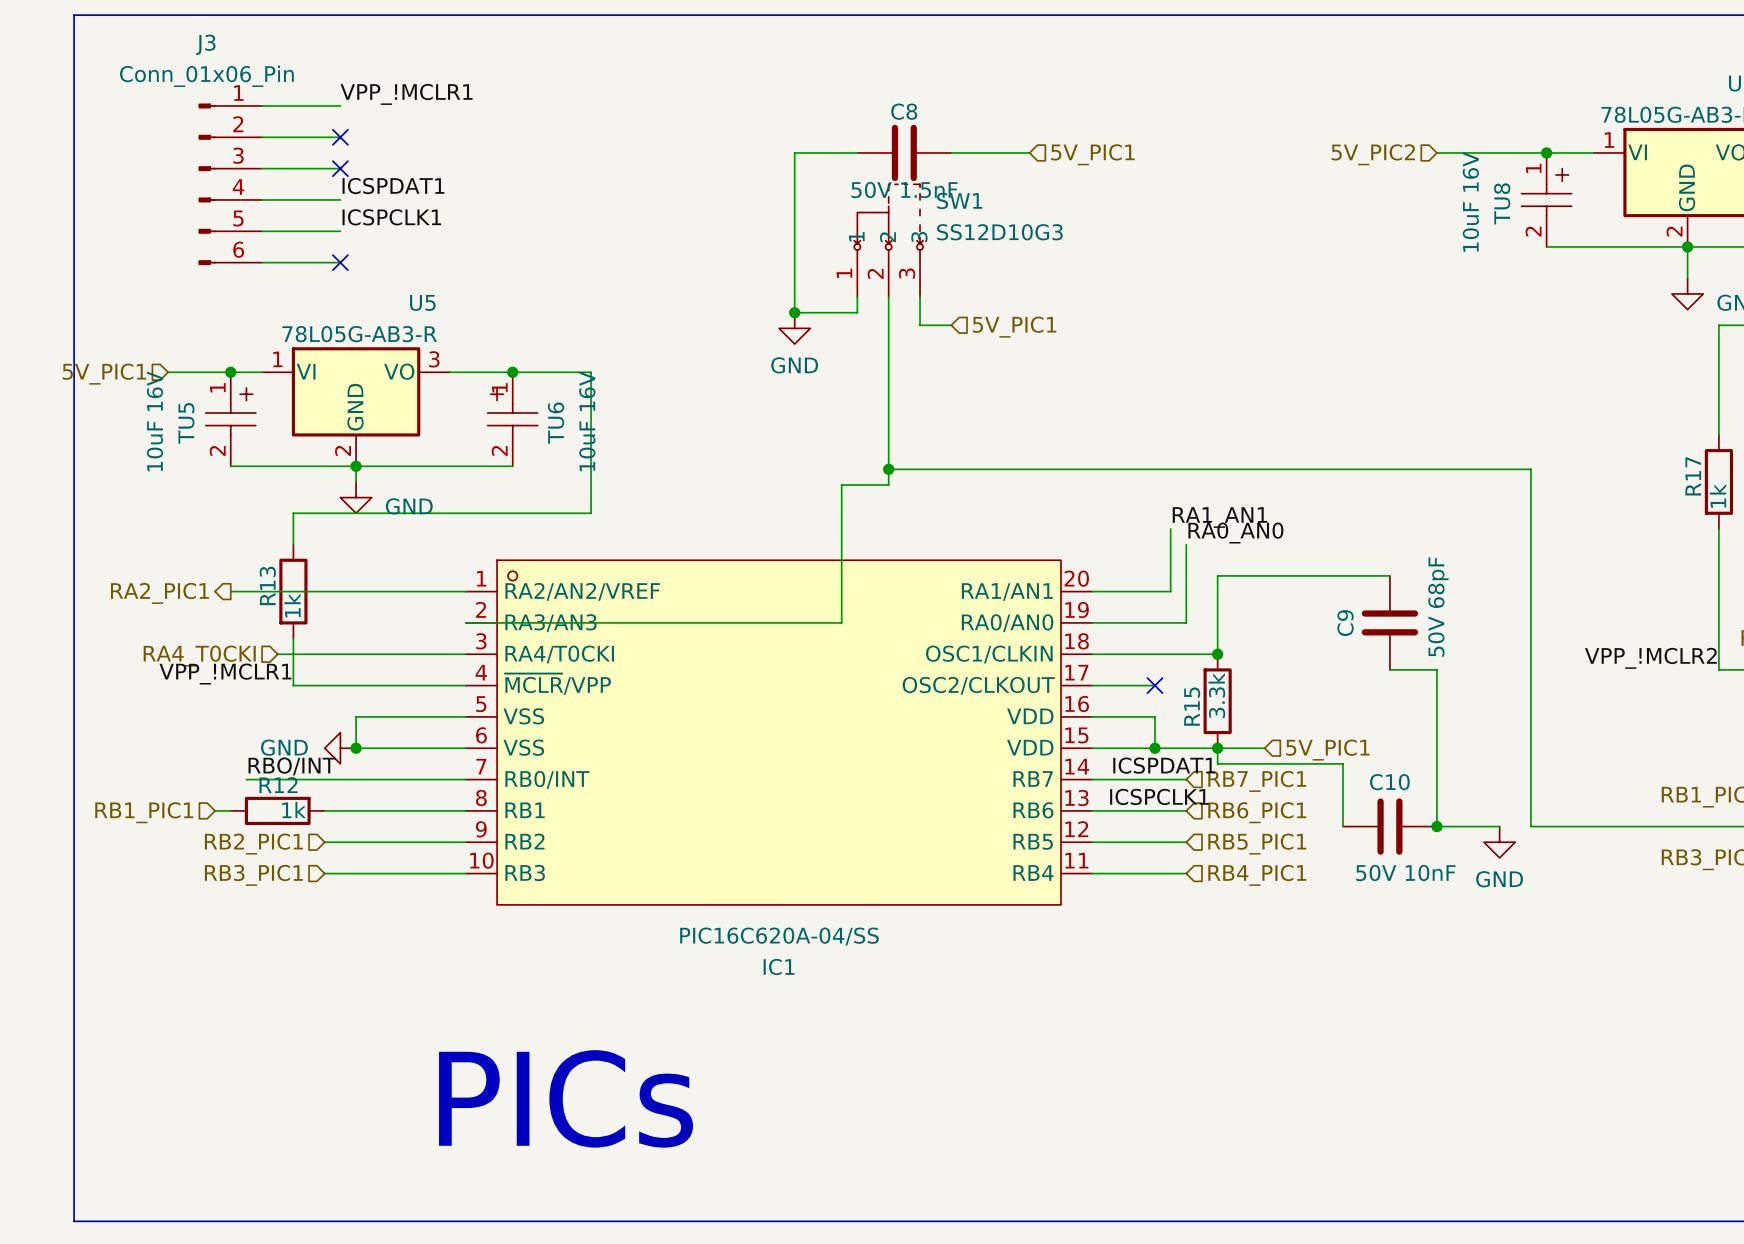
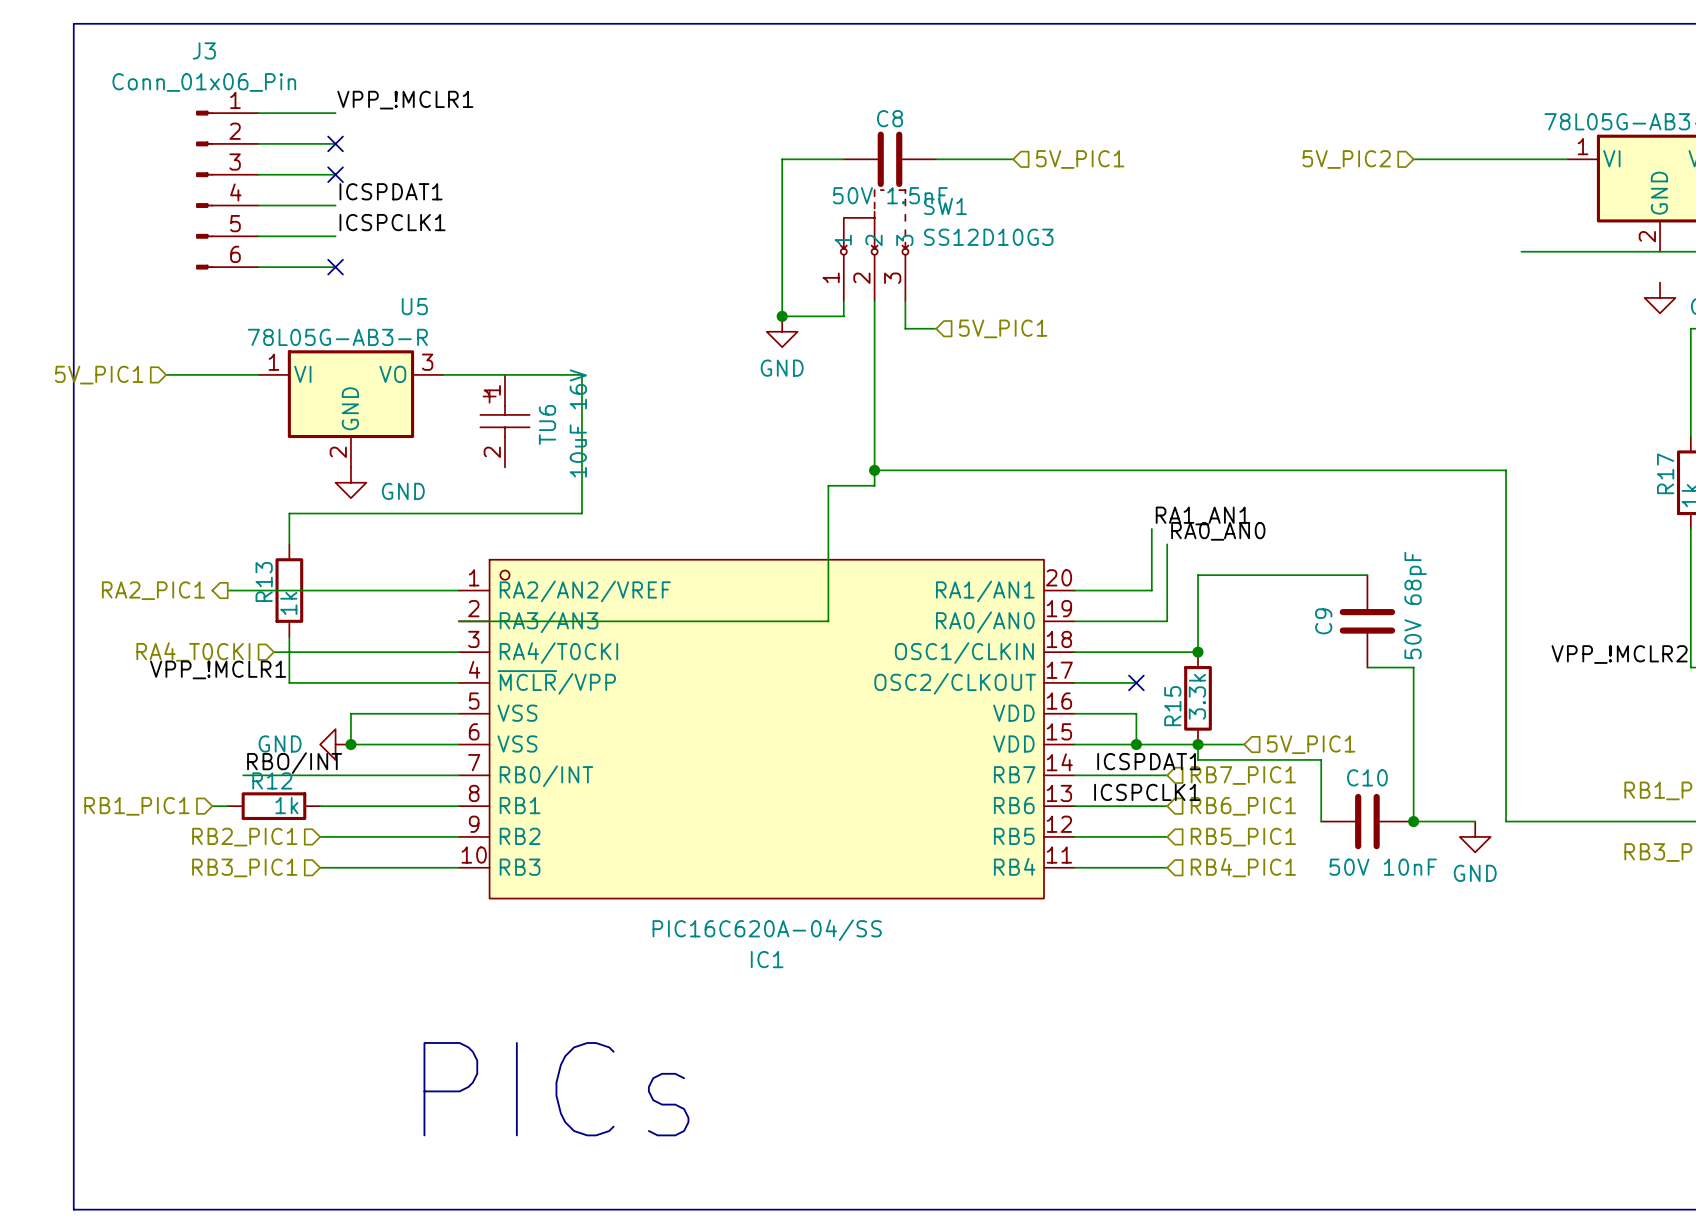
junction: (1546, 152) -> none
TU8: 10uF 16V (1546, 199) -> none
wire: (1687, 246) (1687, 278) -> none
junction: (1687, 246) -> none
junction: (230, 372) -> none
junction: (512, 372) -> none
TU5: 10uF 16V (230, 419) -> none
wire: (230, 466) (512, 466) -> none
junction: (356, 466) -> none
power symbol position: GND (356, 497) -> GND (350, 482)

